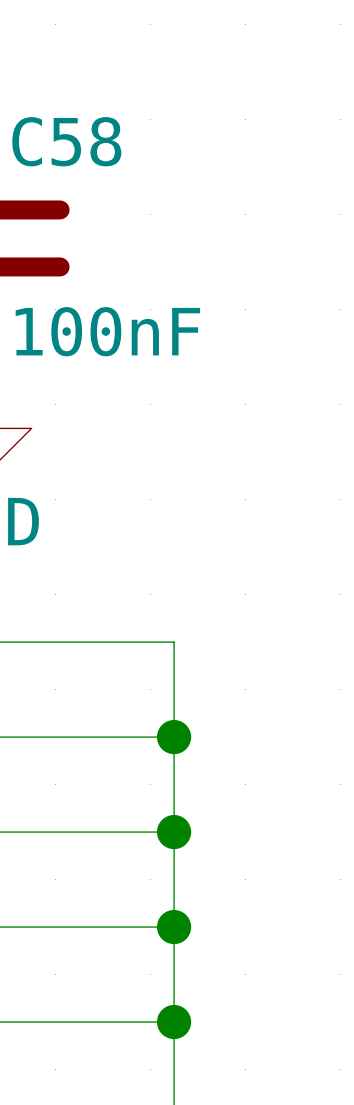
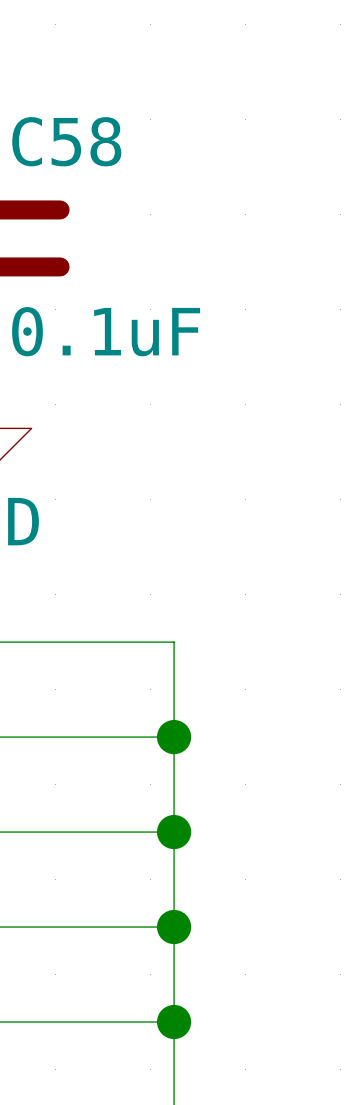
C58 value: 100nF (107, 331) -> 0.1uF (106, 331)

